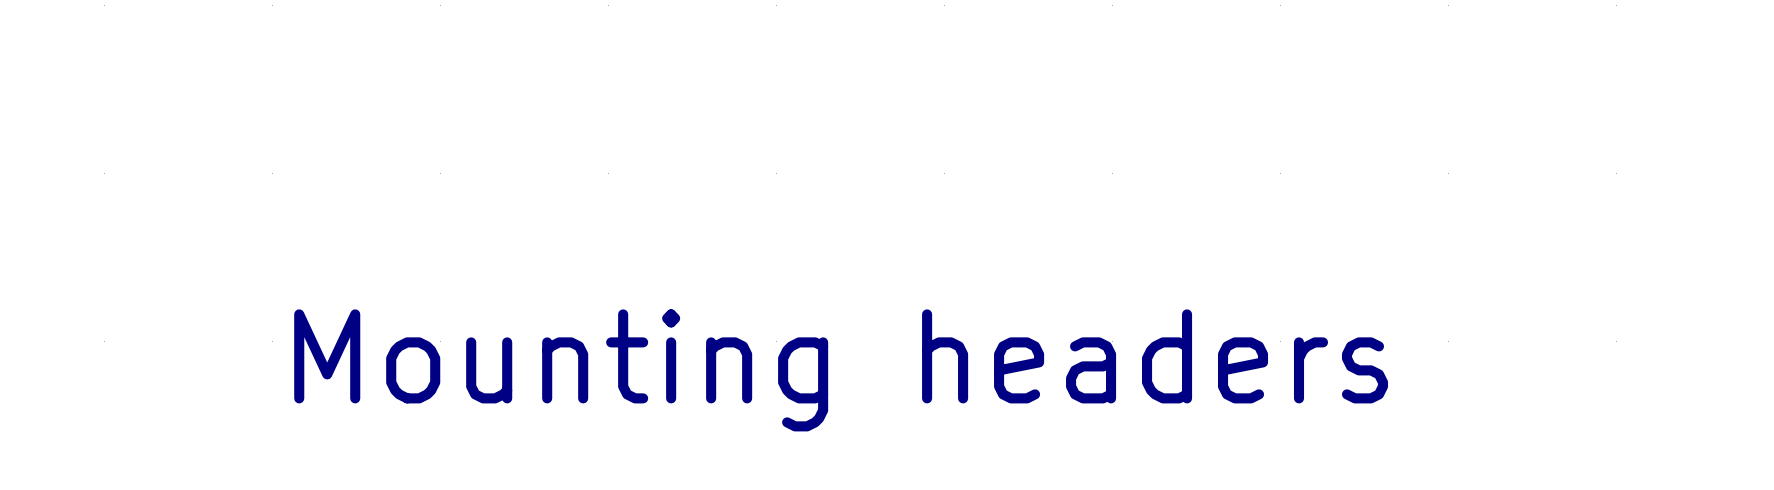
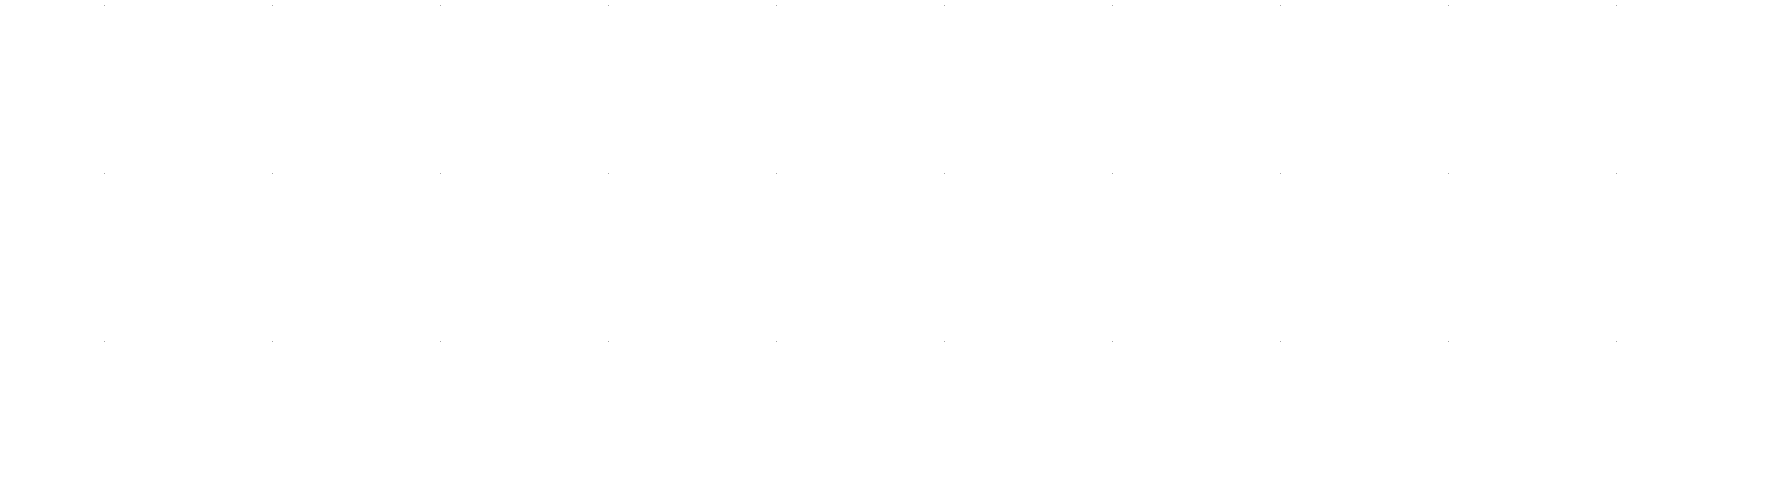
text: Mounting headers (841, 370) -> none

